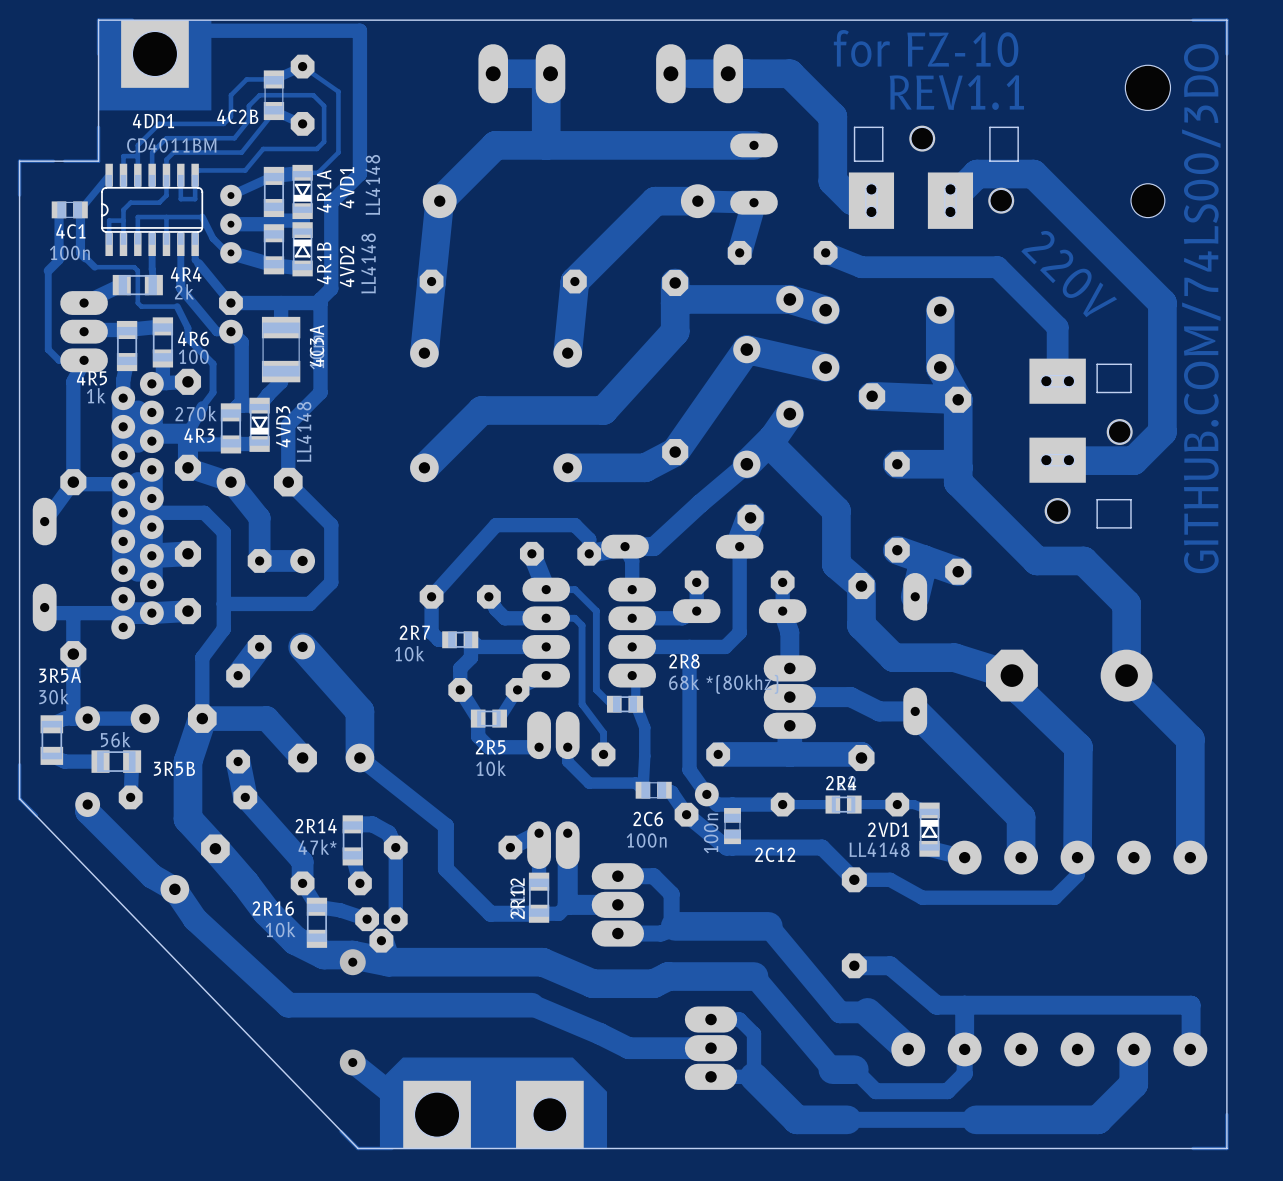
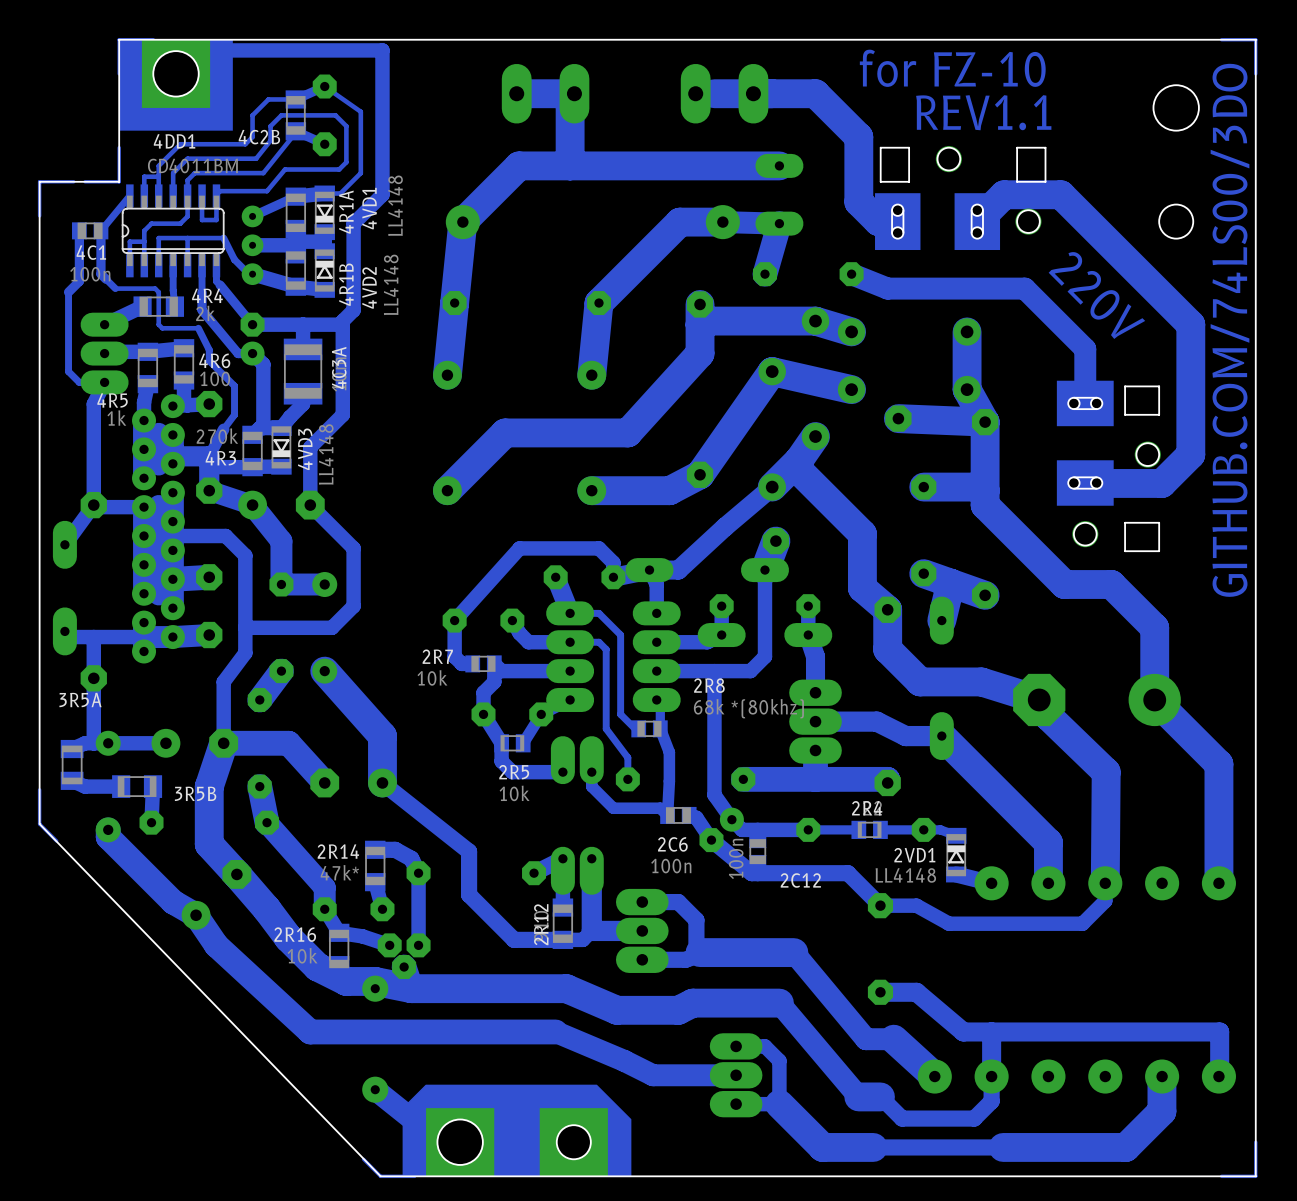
3R5A value: 30k (54, 696) -> none
3R5B value: 56k (115, 739) -> none

